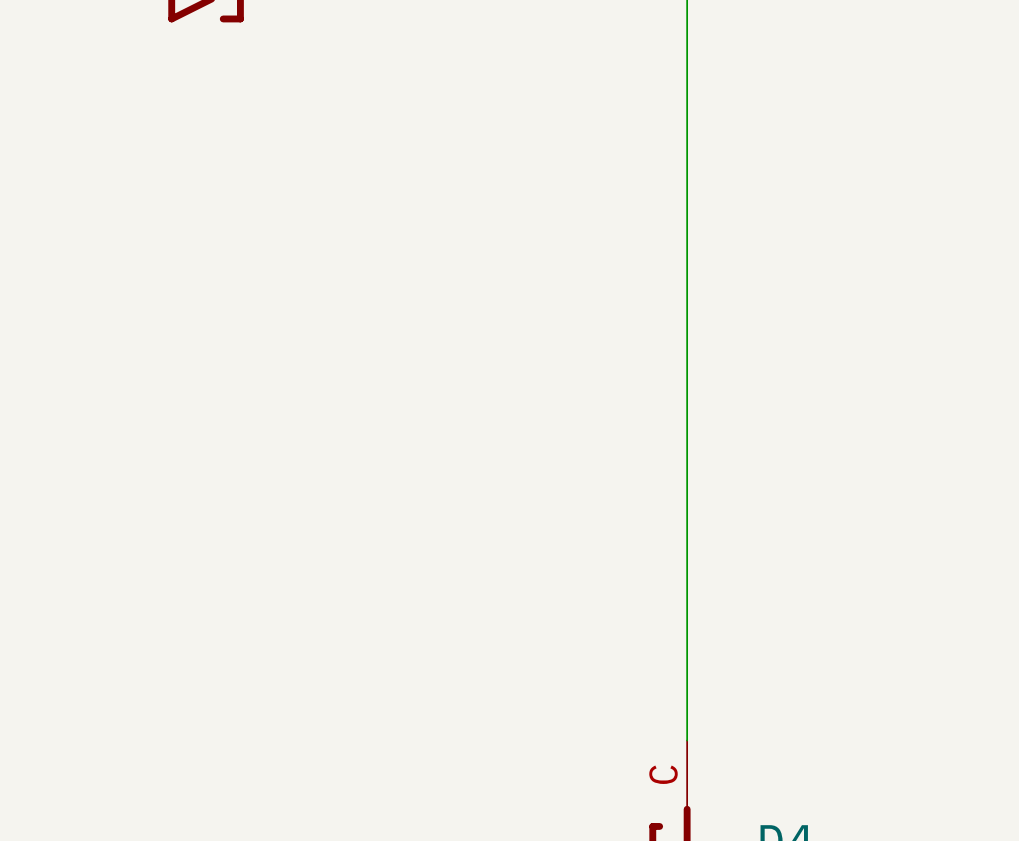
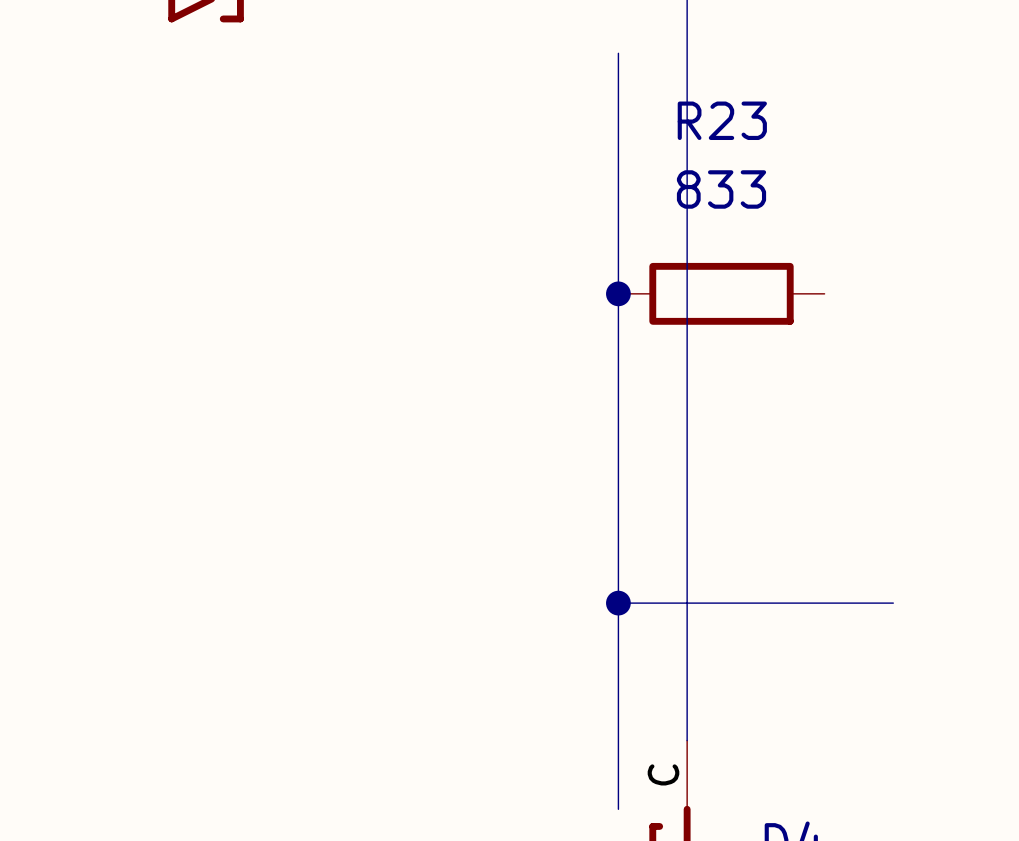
wire: none -> (618, 53) (618, 809)
junction: none -> (618, 293)
R23: none -> 833 (721, 293)
wire: none -> (618, 603) (893, 603)
junction: none -> (618, 603)

